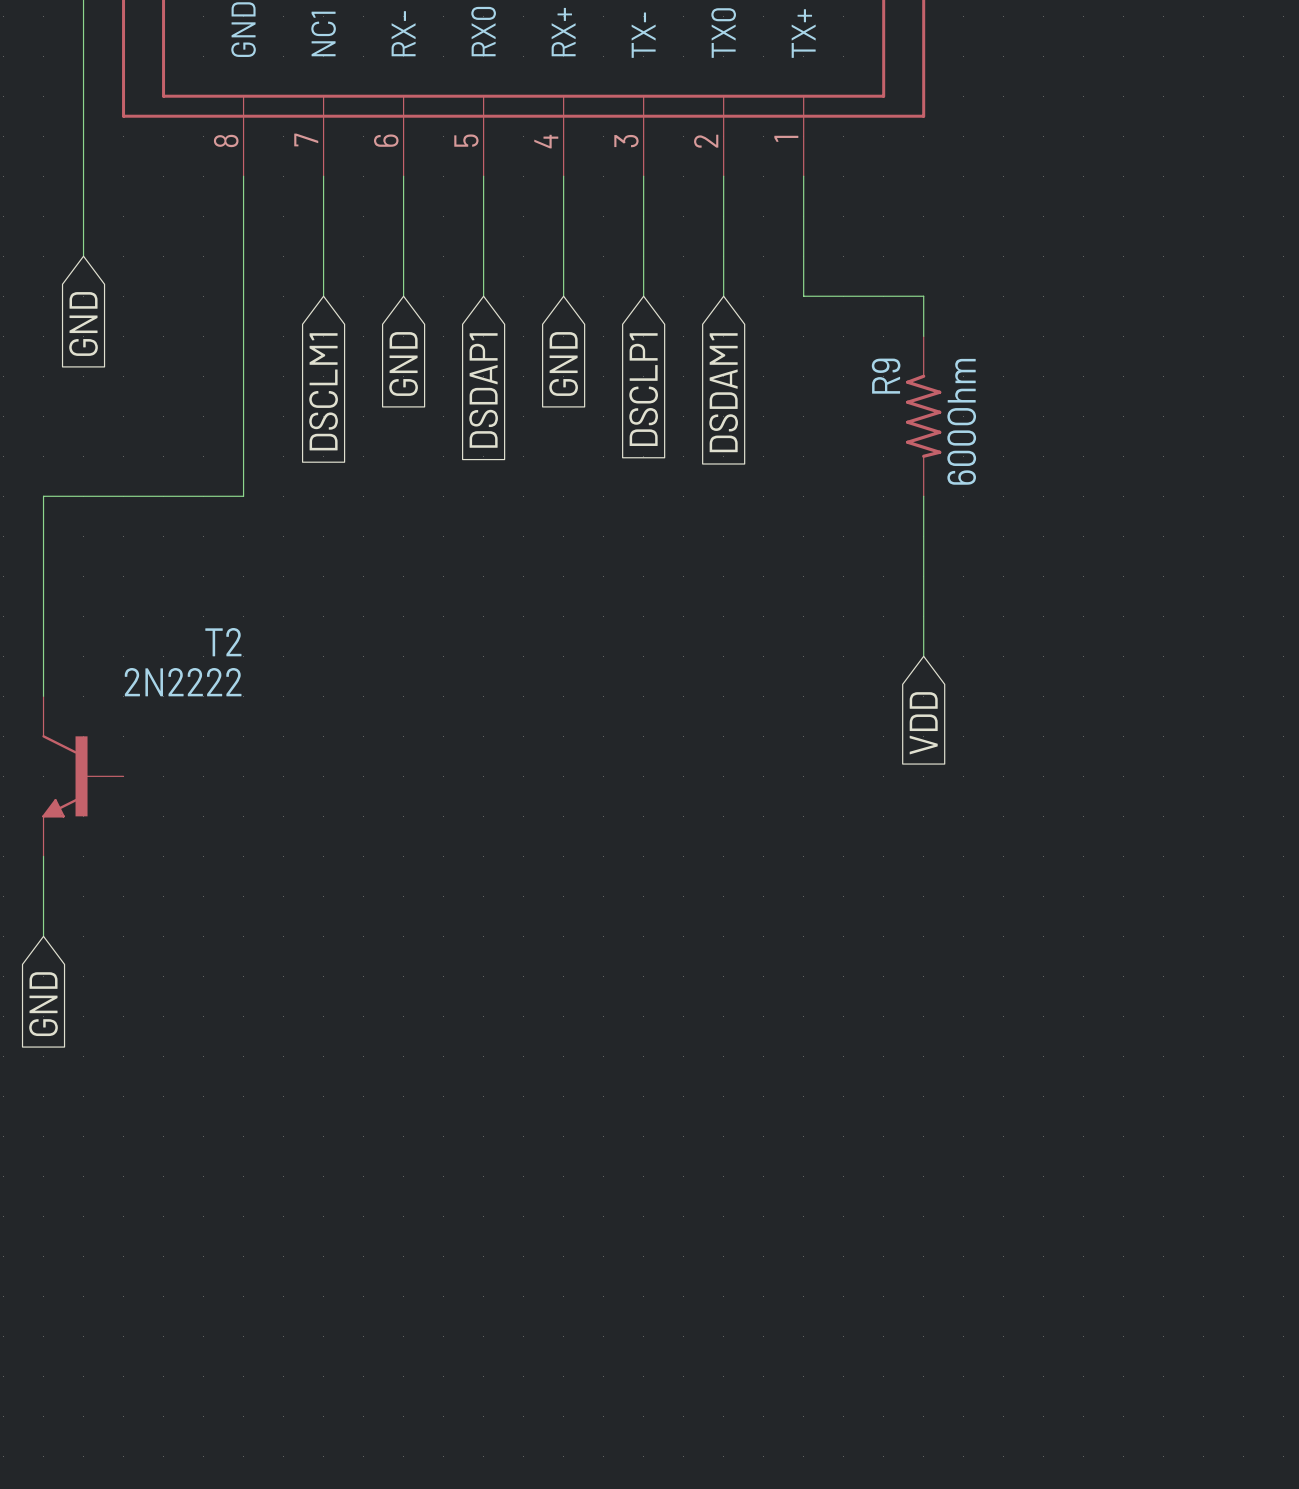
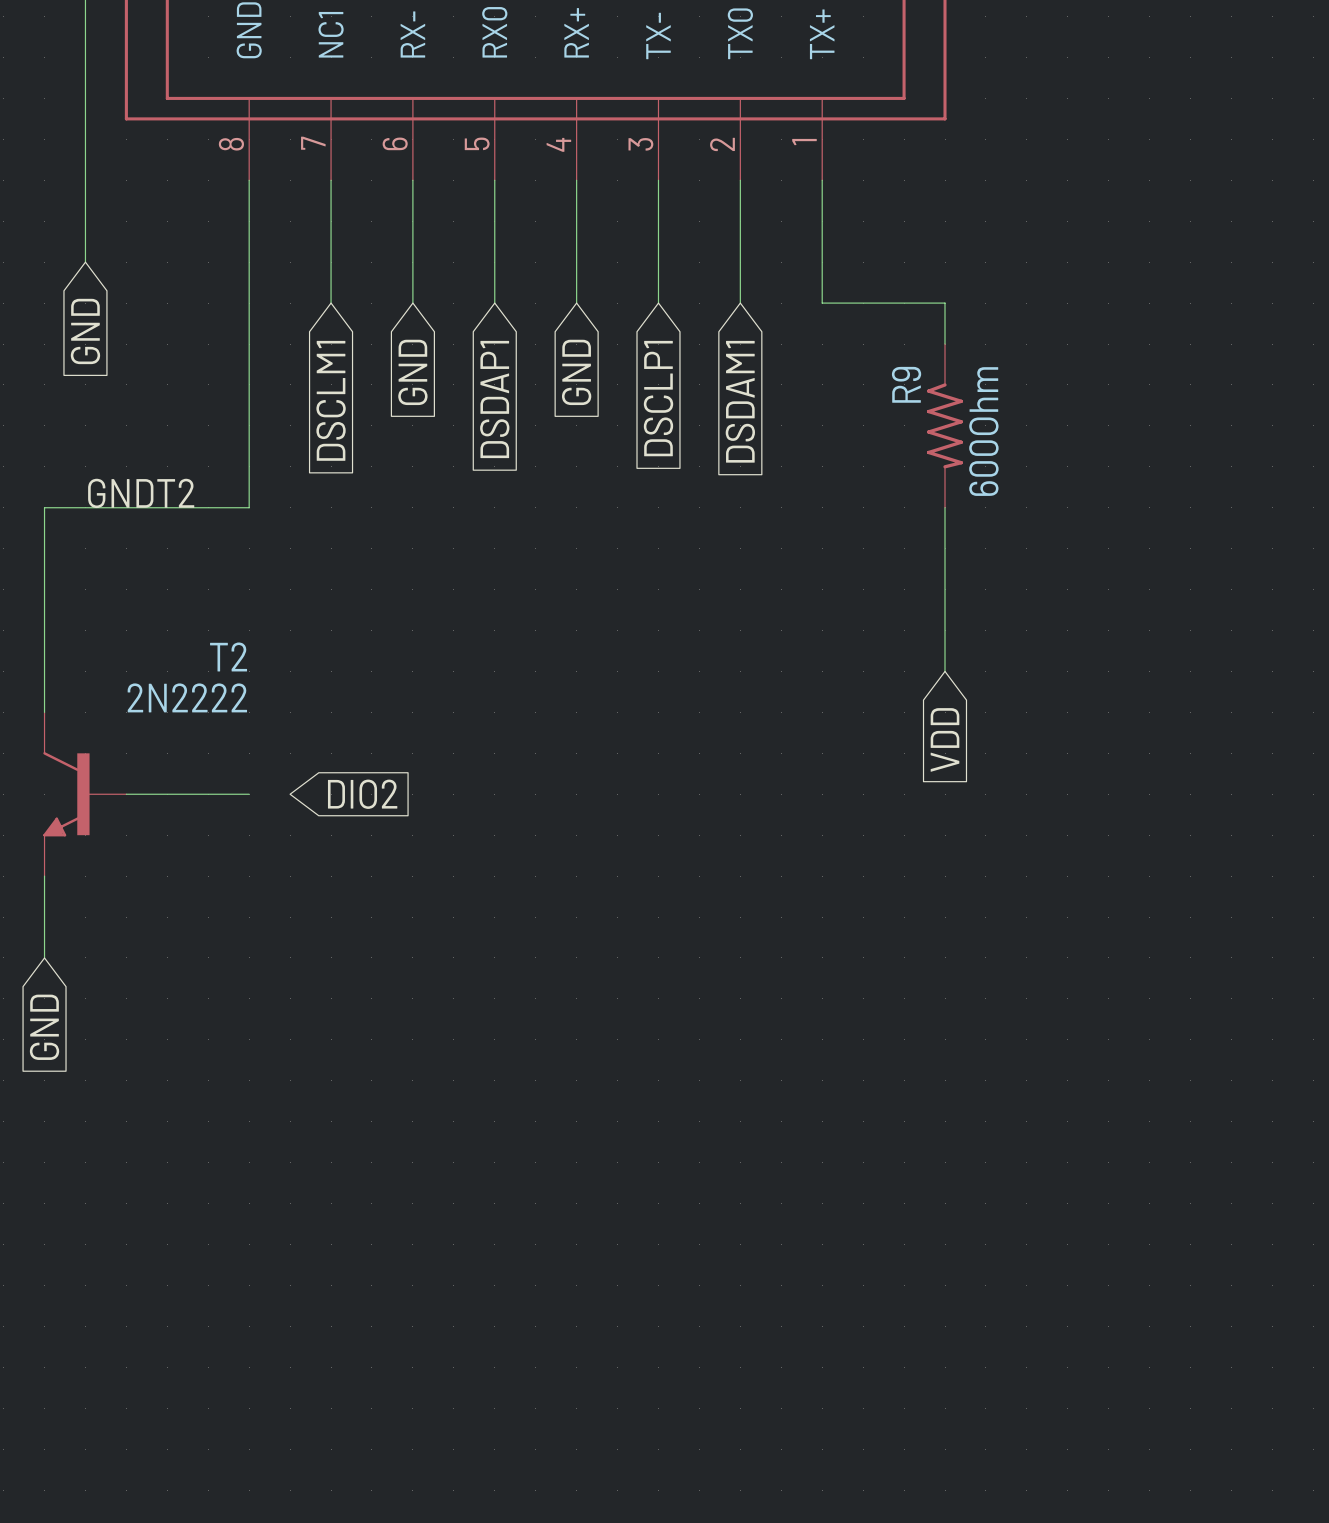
label: none -> GNDT2 (141, 493)
wire: none -> (126, 794) (249, 794)
global label: none -> DIO2 (362, 794)

